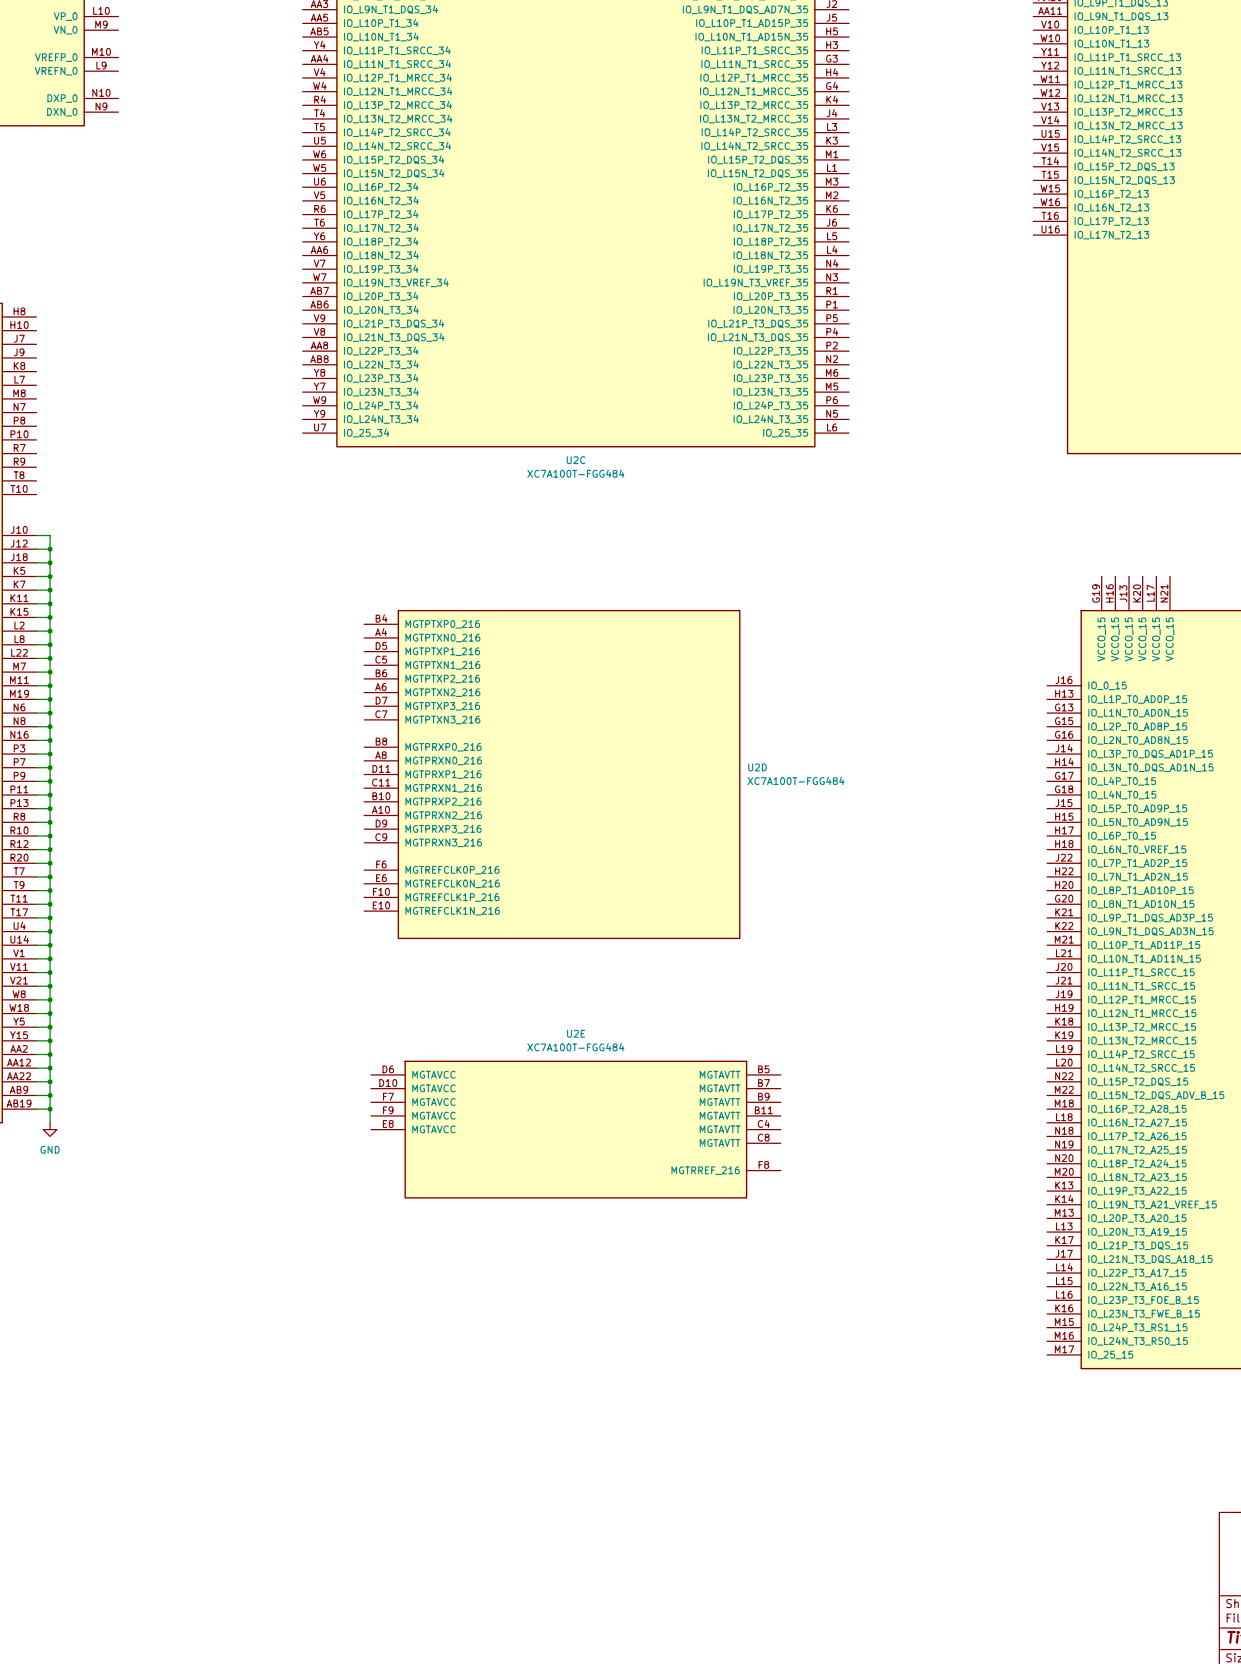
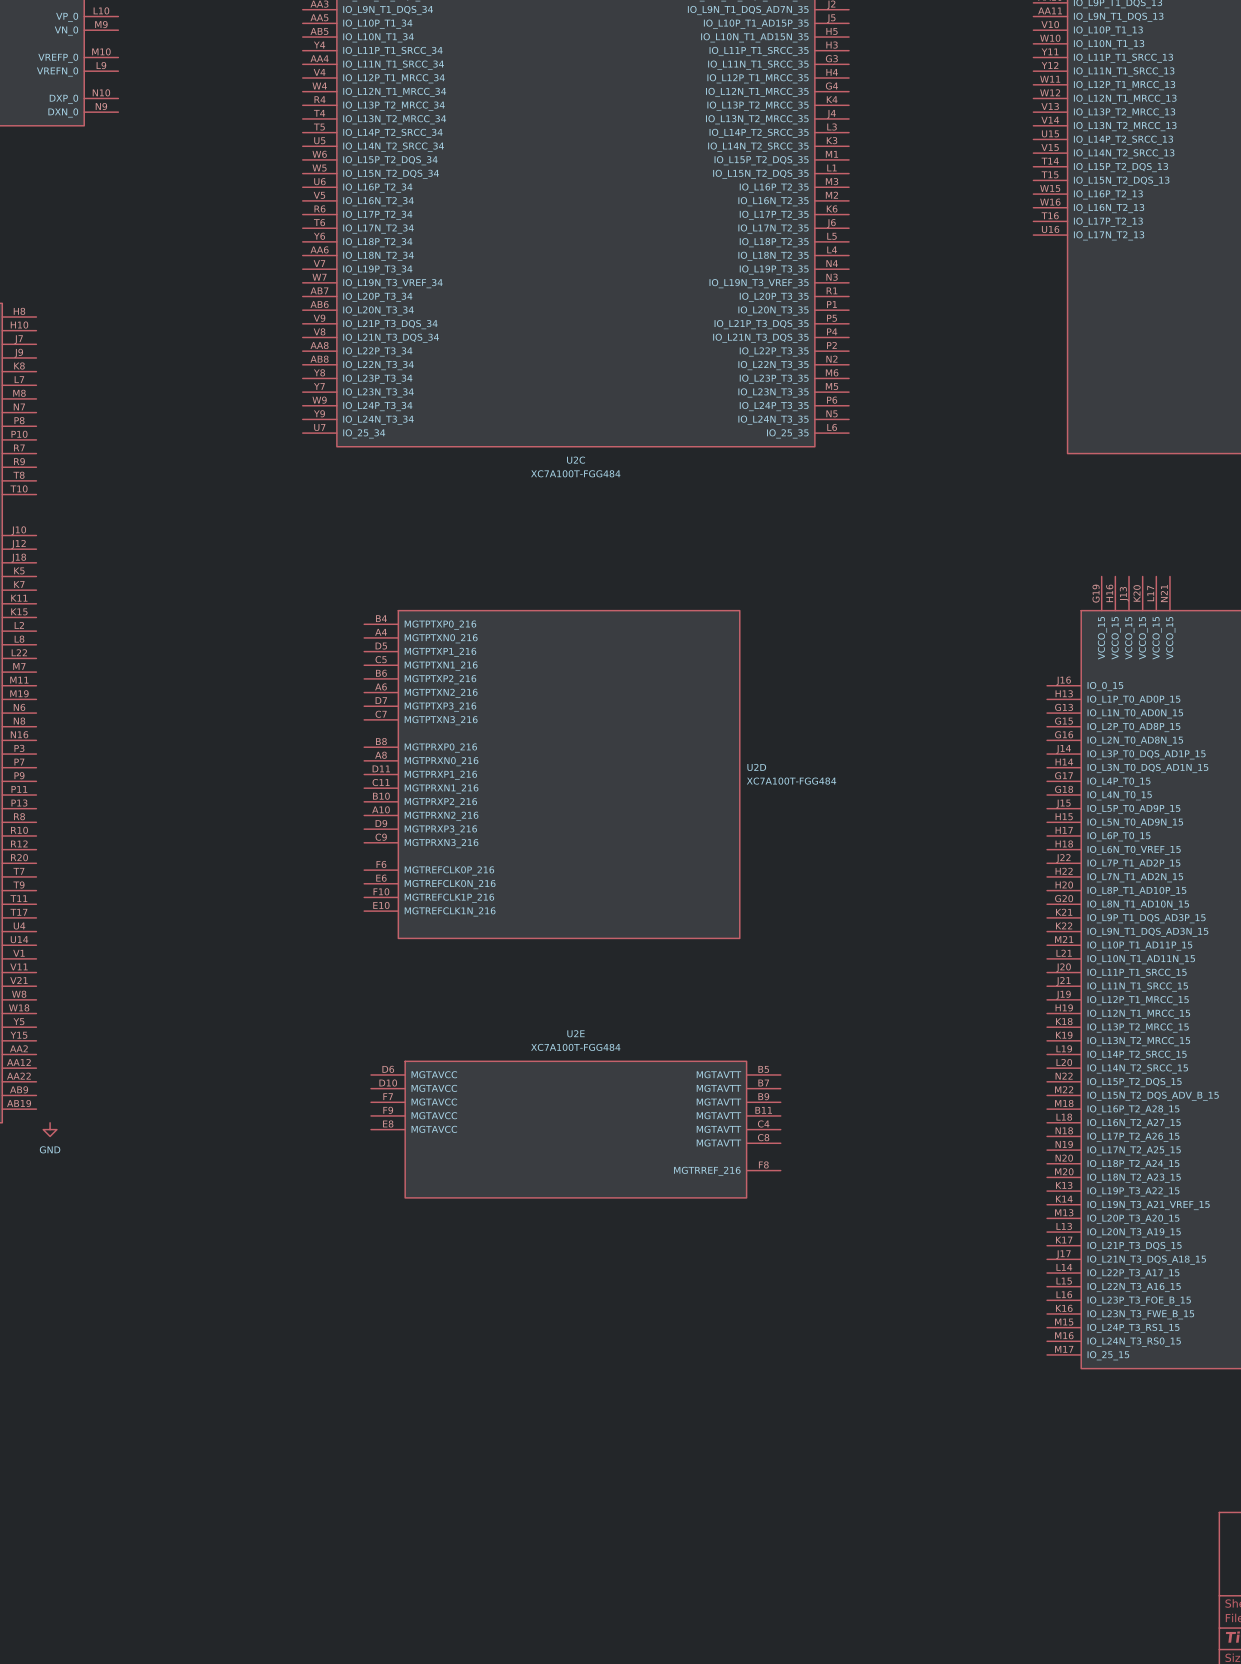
wire: (36, 535) (50, 535) (50, 1122) -> none
wire: (36, 549) (50, 549) -> none
junction: (50, 549) -> none
wire: (36, 562) (50, 562) -> none
junction: (50, 562) -> none
wire: (36, 576) (50, 576) -> none
junction: (50, 576) -> none
wire: (36, 590) (50, 590) -> none
junction: (50, 590) -> none
wire: (36, 603) (50, 603) -> none
junction: (50, 603) -> none
wire: (36, 617) (50, 617) -> none
junction: (50, 617) -> none
wire: (36, 631) (50, 631) -> none
junction: (50, 631) -> none
wire: (36, 644) (50, 644) -> none
junction: (50, 644) -> none
wire: (36, 658) (50, 658) -> none
junction: (50, 658) -> none
wire: (36, 672) (50, 672) -> none
junction: (50, 672) -> none
wire: (36, 685) (50, 685) -> none
junction: (50, 685) -> none
wire: (36, 699) (50, 699) -> none
junction: (50, 699) -> none
wire: (36, 713) (50, 713) -> none
junction: (50, 713) -> none
wire: (36, 726) (50, 726) -> none
junction: (50, 726) -> none
wire: (36, 740) (50, 740) -> none
junction: (50, 740) -> none
wire: (36, 754) (50, 754) -> none
junction: (50, 754) -> none
wire: (36, 767) (50, 767) -> none
junction: (50, 767) -> none
wire: (36, 781) (50, 781) -> none
junction: (50, 781) -> none
wire: (36, 795) (50, 795) -> none
junction: (50, 795) -> none
wire: (36, 808) (50, 808) -> none
junction: (50, 808) -> none
wire: (36, 822) (50, 822) -> none
junction: (50, 822) -> none
wire: (36, 835) (50, 835) -> none
junction: (50, 835) -> none
wire: (36, 849) (50, 849) -> none
junction: (50, 849) -> none
wire: (36, 863) (50, 863) -> none
junction: (50, 863) -> none
wire: (36, 876) (50, 876) -> none
junction: (50, 876) -> none
wire: (36, 890) (50, 890) -> none
junction: (50, 890) -> none
wire: (36, 904) (50, 904) -> none
junction: (50, 904) -> none
wire: (36, 917) (50, 917) -> none
junction: (50, 917) -> none
wire: (36, 931) (50, 931) -> none
junction: (50, 931) -> none
wire: (36, 945) (50, 945) -> none
junction: (50, 945) -> none
wire: (36, 958) (50, 958) -> none
junction: (50, 958) -> none
wire: (36, 972) (50, 972) -> none
junction: (50, 972) -> none
wire: (36, 986) (50, 986) -> none
junction: (50, 986) -> none
wire: (36, 999) (50, 999) -> none
junction: (50, 999) -> none
wire: (36, 1013) (50, 1013) -> none
junction: (50, 1013) -> none
wire: (36, 1027) (50, 1027) -> none
junction: (50, 1027) -> none
wire: (36, 1040) (50, 1040) -> none
junction: (50, 1040) -> none
wire: (36, 1054) (50, 1054) -> none
junction: (50, 1054) -> none
wire: (36, 1068) (50, 1068) -> none
junction: (50, 1068) -> none
wire: (36, 1081) (50, 1081) -> none
junction: (50, 1081) -> none
wire: (36, 1095) (50, 1095) -> none
junction: (50, 1095) -> none
wire: (36, 1109) (50, 1109) -> none
junction: (50, 1109) -> none

